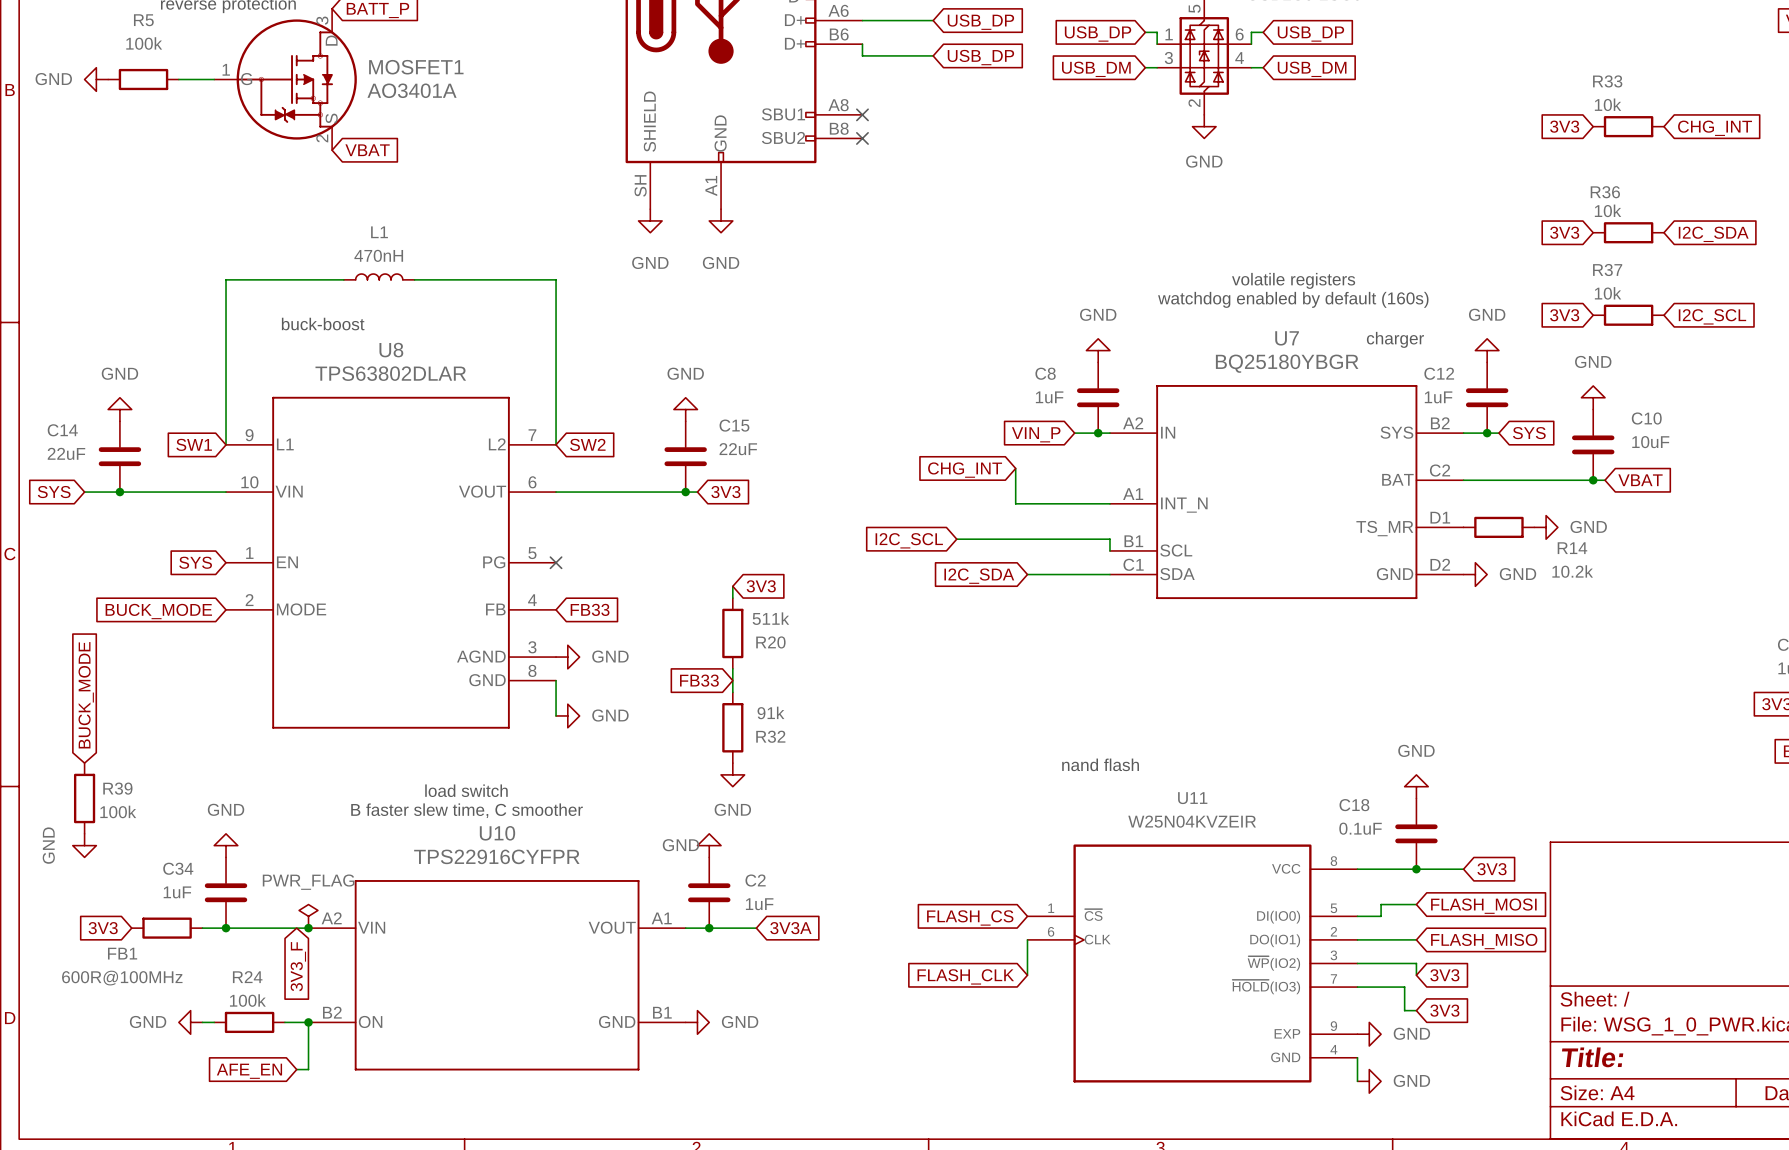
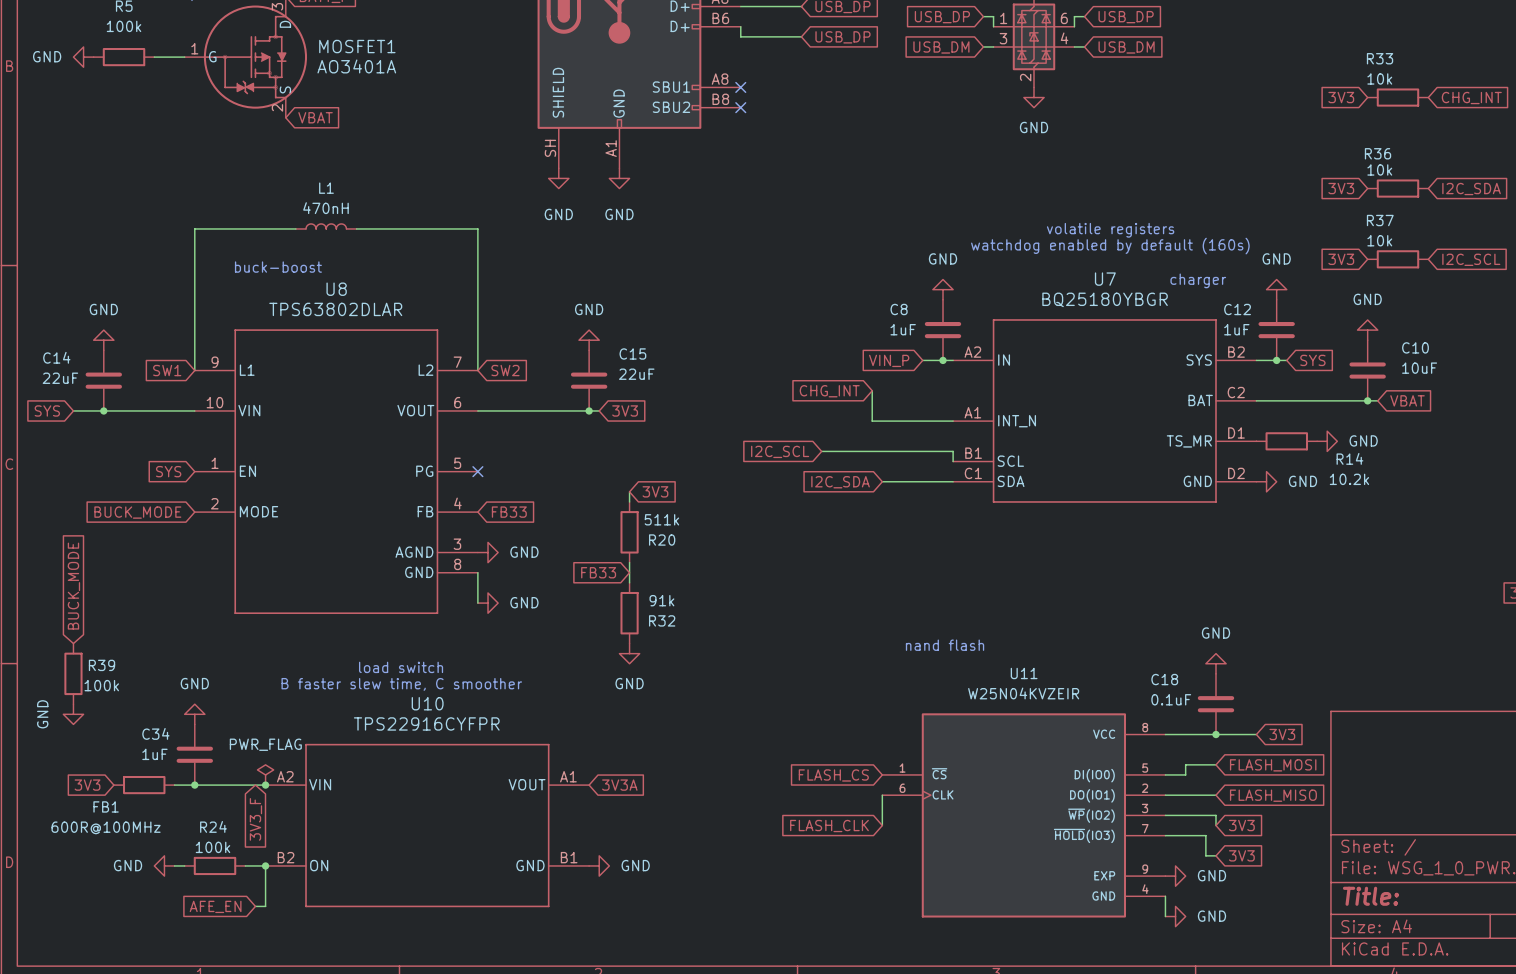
power symbol: GND (709, 845) -> none
C2: 1uF (709, 892) -> none
wire: (685, 928) (756, 928) -> none
junction: (709, 928) -> none
global label position: 3V3A (790, 928) -> 3V3A (619, 785)

